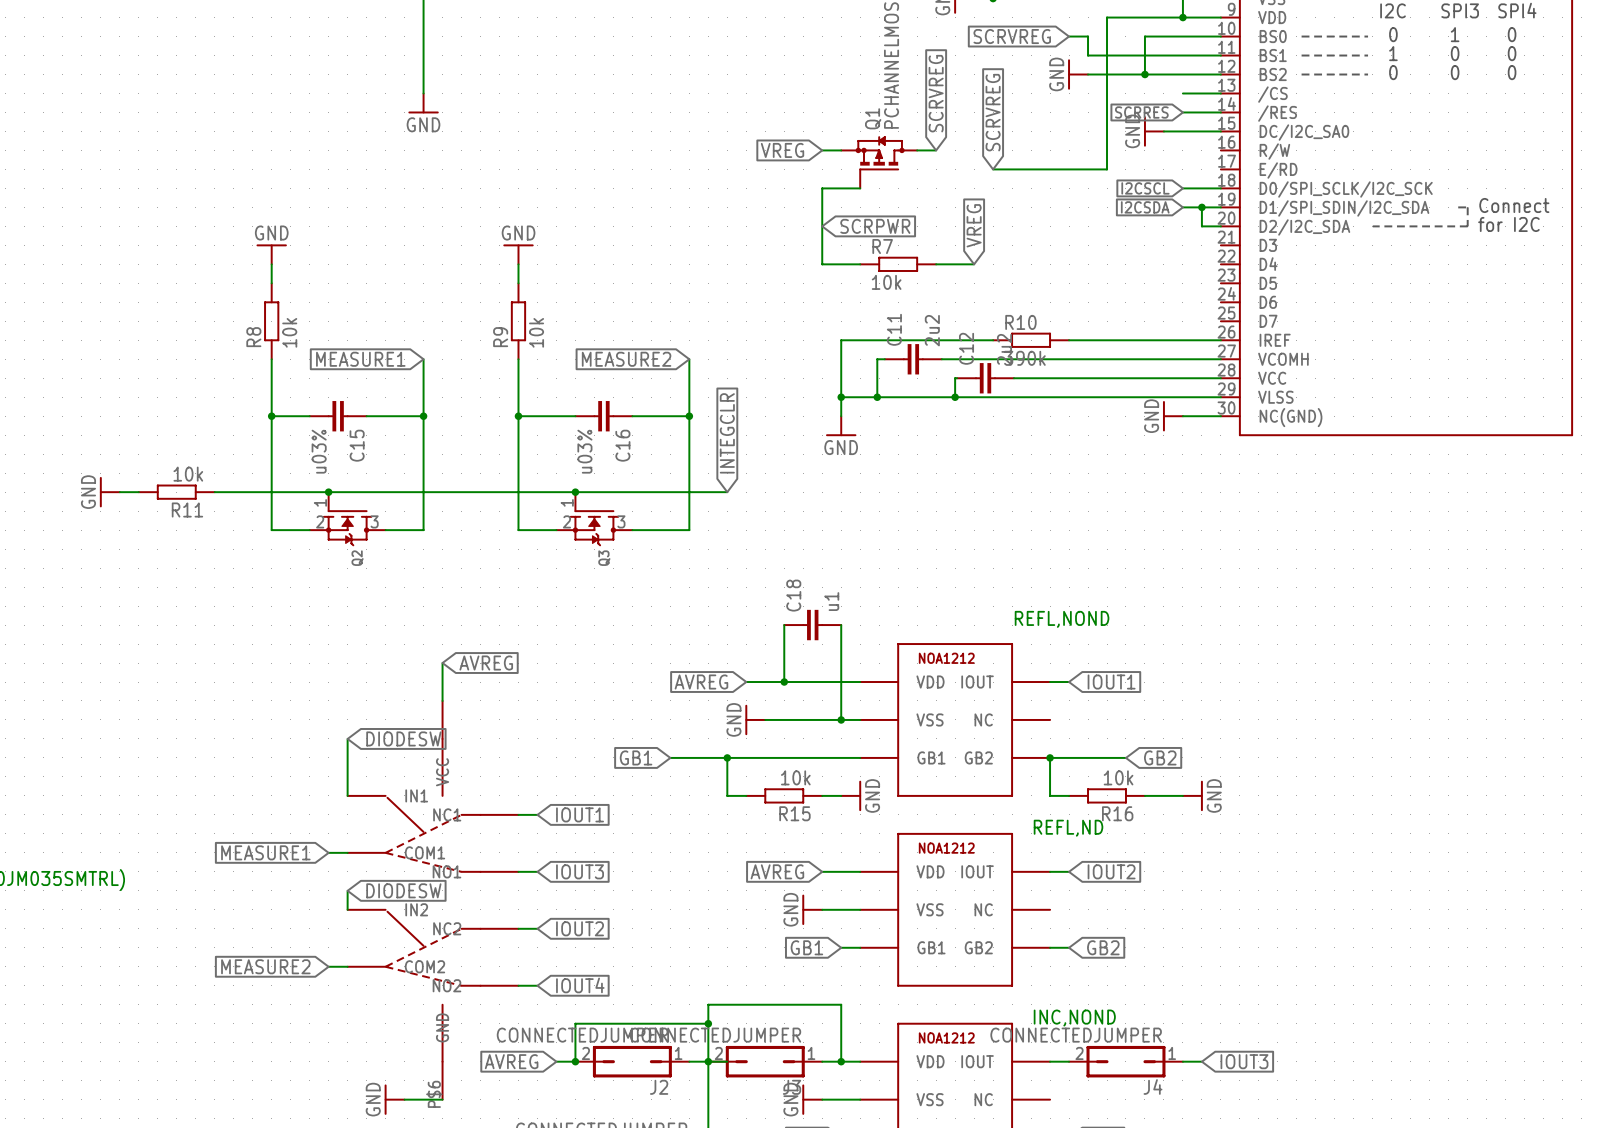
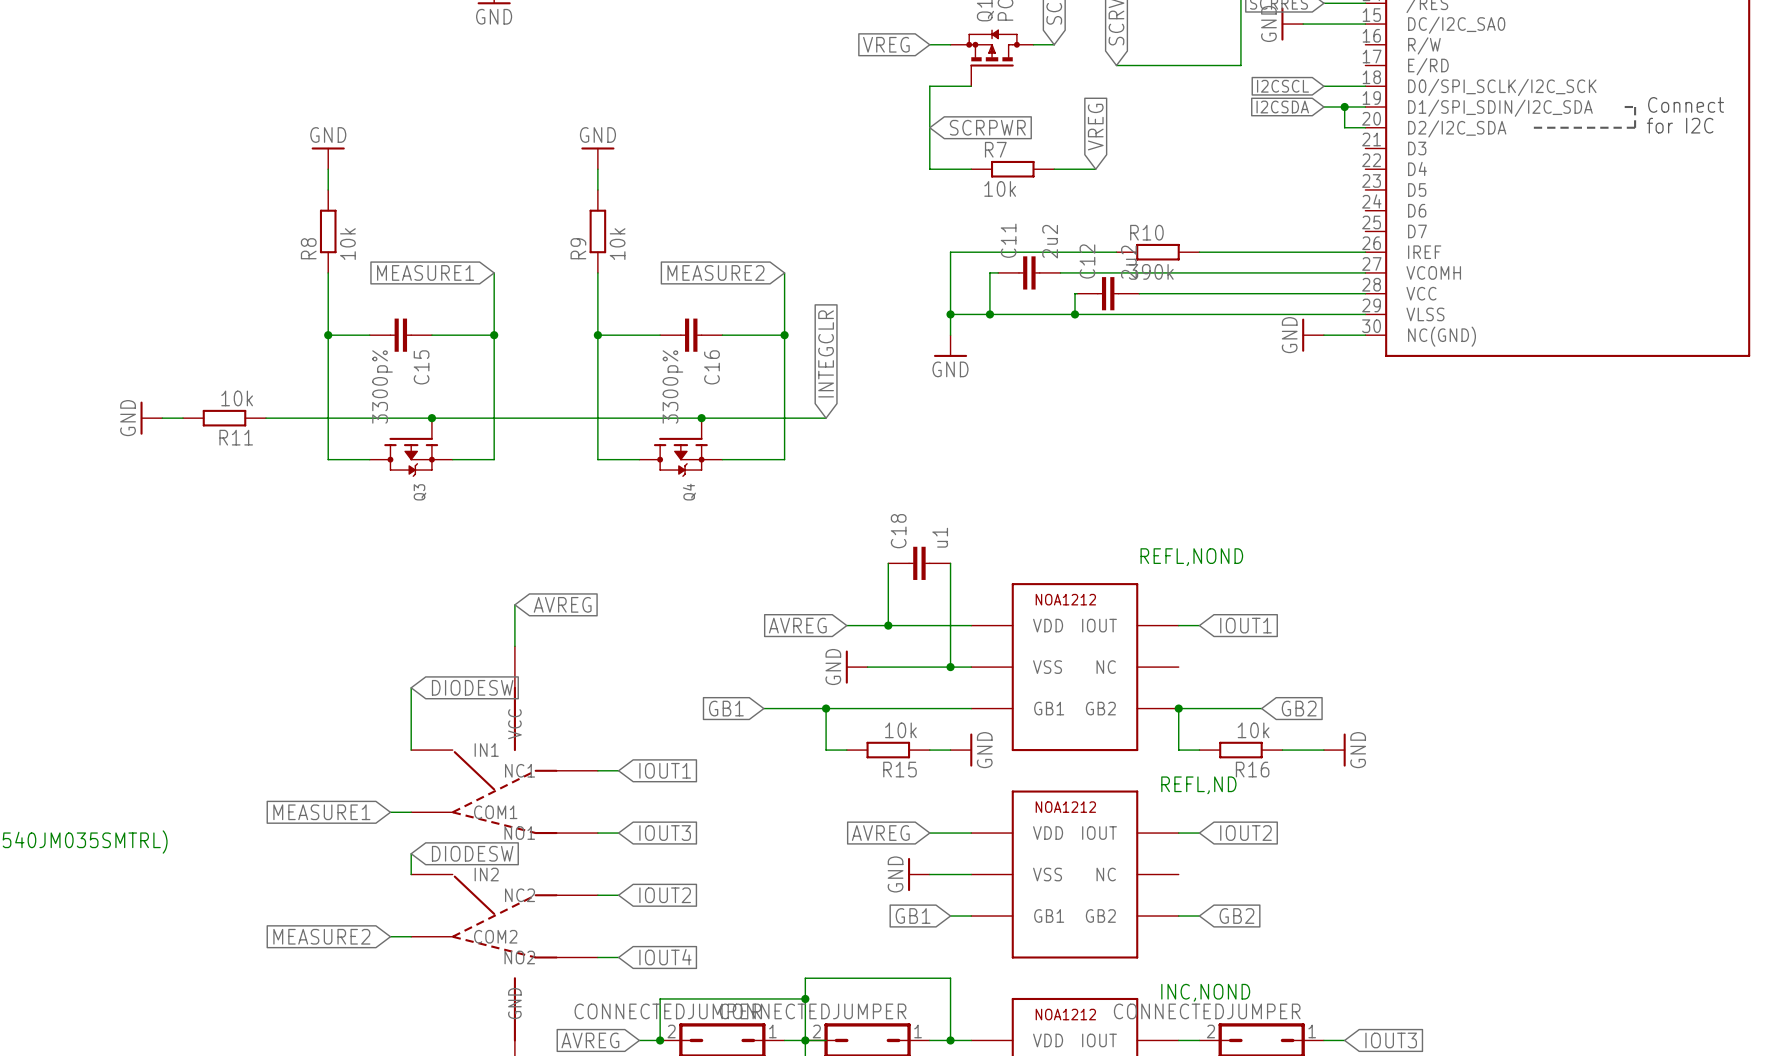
C15 value: u03% (319, 451) -> 3300p% (382, 386)
C16 value: u03% (584, 451) -> 3300p% (672, 386)
junction position: (328, 492) -> (431, 418)
Q3 symbol: [556, 492, 633, 546] -> [369, 418, 453, 477]
junction position: (575, 492) -> (701, 418)
Q2: (347, 519) -> none
Q4: none -> (680, 447)

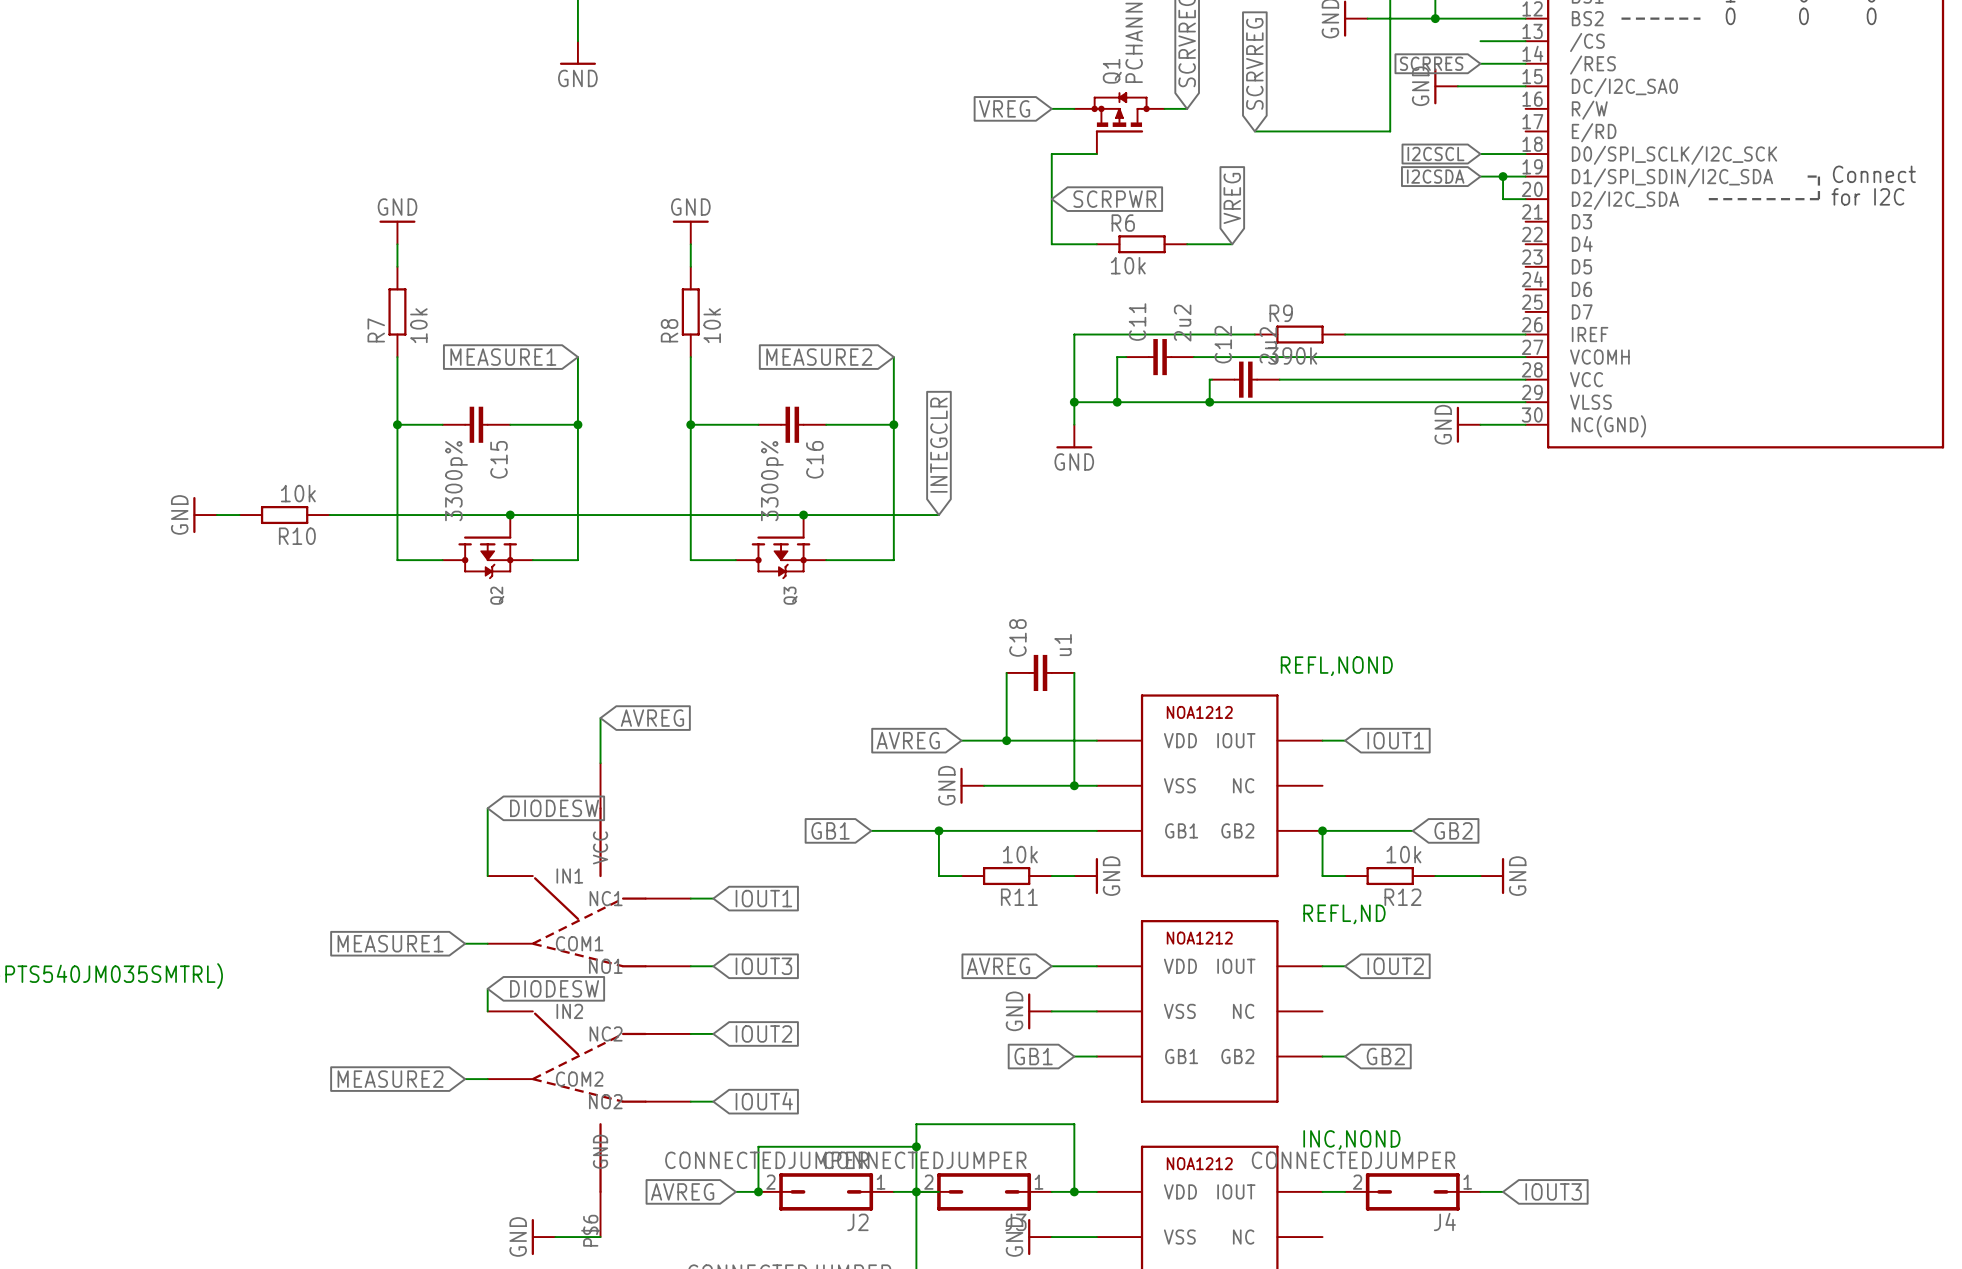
R7 name: R7 (995, 149) -> R6 (1123, 223)
R10 name: R10 (1146, 232) -> R9 (1281, 313)
R8 name: R8 (308, 248) -> R7 (376, 330)
R9 name: R9 (578, 248) -> R8 (669, 330)
R11 name: R11 (236, 437) -> R10 (297, 536)
Q3 name: Q3 (419, 492) -> Q2 (497, 595)
Q4 name: Q4 (689, 492) -> Q3 (790, 595)
R15 name: R15 (899, 769) -> R11 (1019, 897)
R16 name: R16 (1252, 769) -> R12 (1402, 897)

